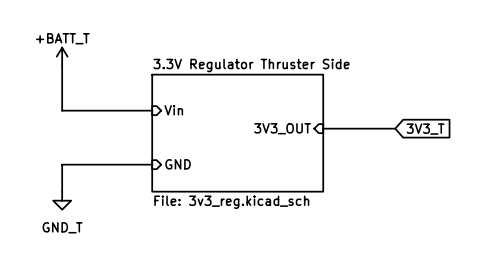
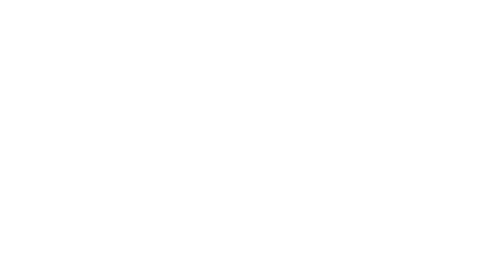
power symbol: +BATT_T (62, 56) -> none
wire: (62, 65) (62, 110) (152, 110) -> none
sheet pin: Vin (173, 110) -> none
sheet pin: 3V3_OUT (282, 128) -> none
wire: (323, 128) (395, 128) -> none
global label: 3V3_T (425, 129) -> none
sheet 3.3V Regulator Thruster Side: File: 3v3_reg.kicad_sch (237, 133) -> none
wire: (152, 164) (62, 164) (62, 191) -> none
sheet pin: GND (178, 164) -> none
power symbol: GND_T (62, 200) -> none

